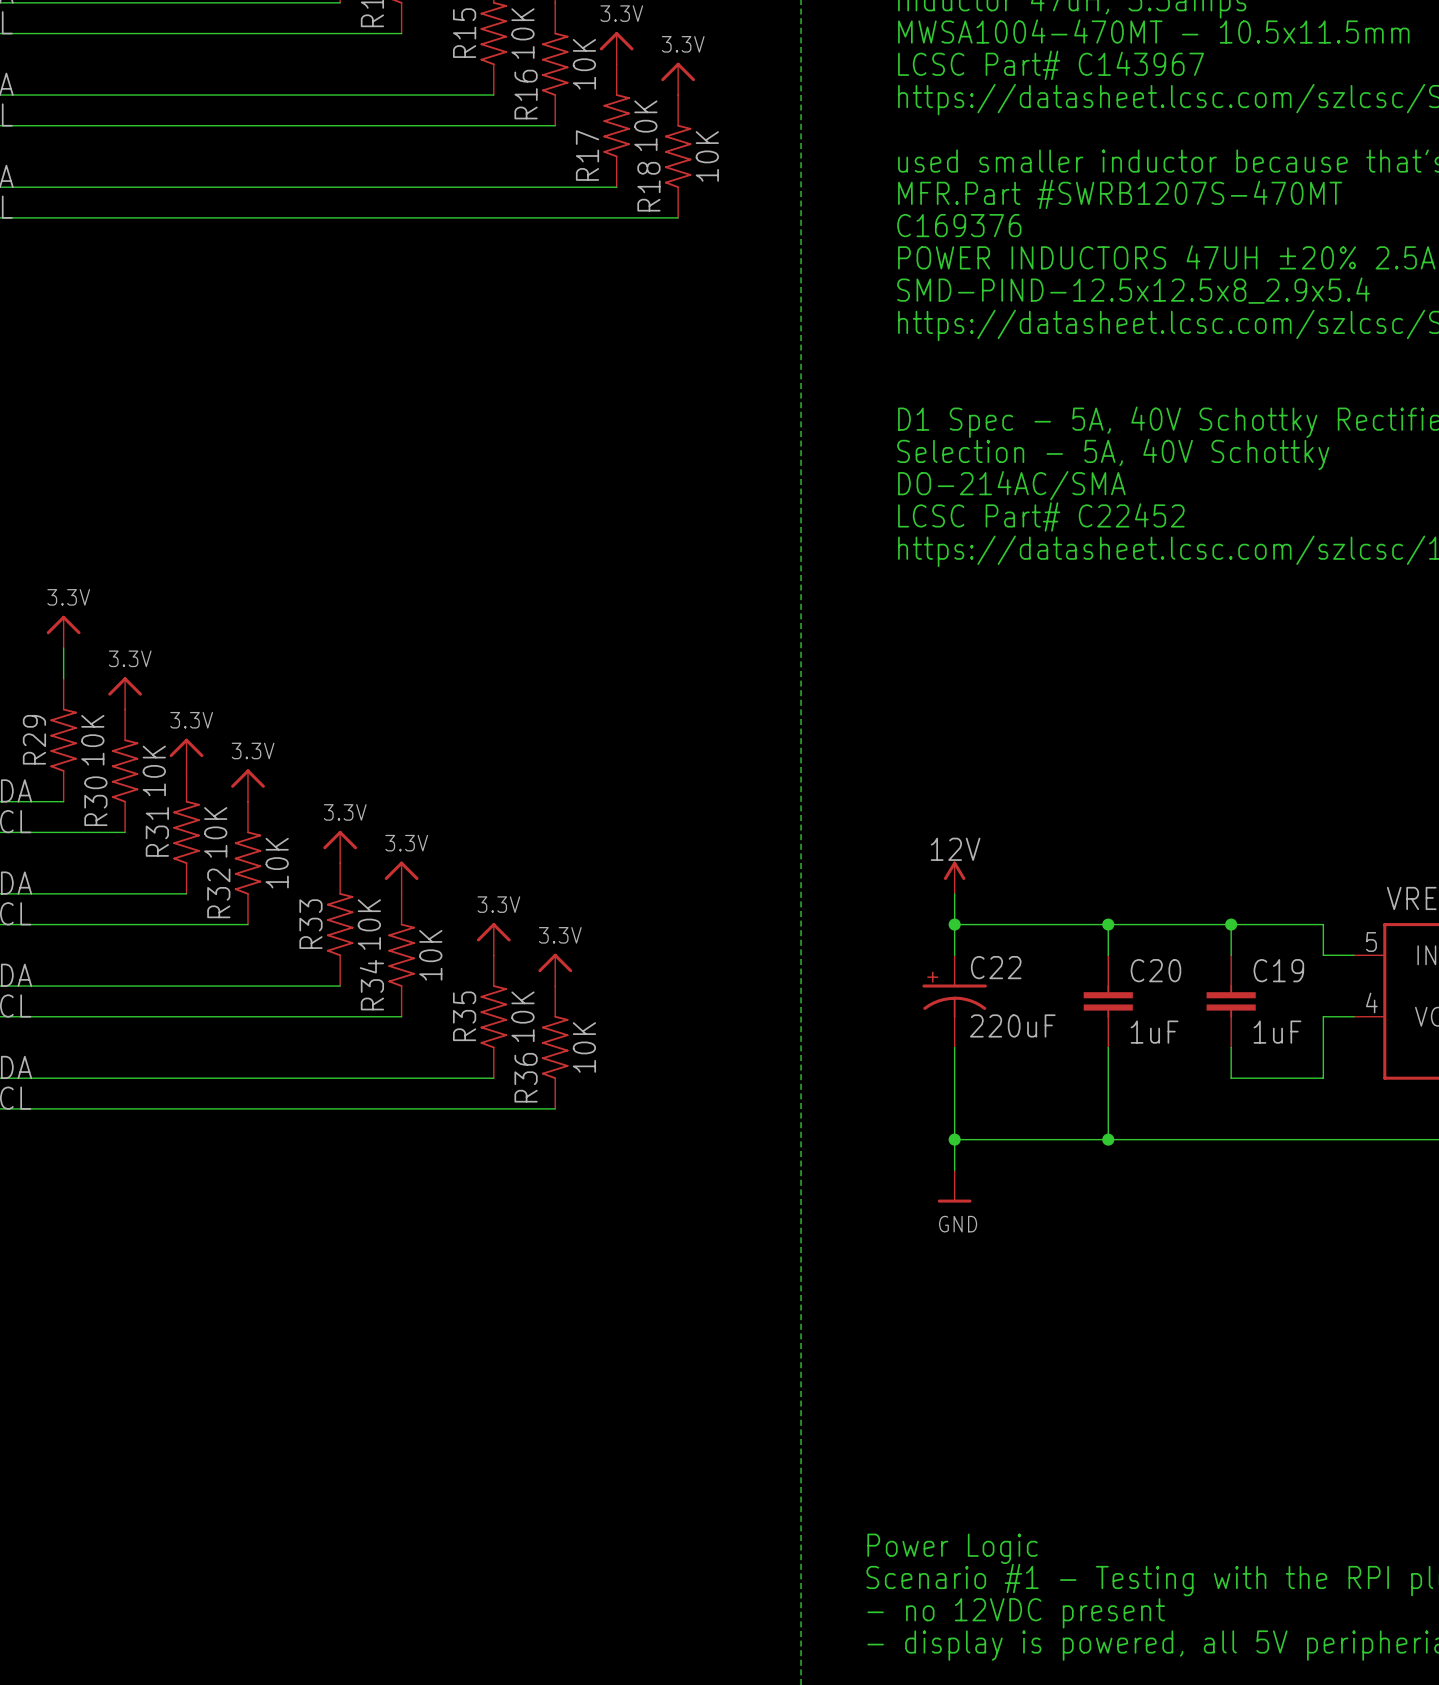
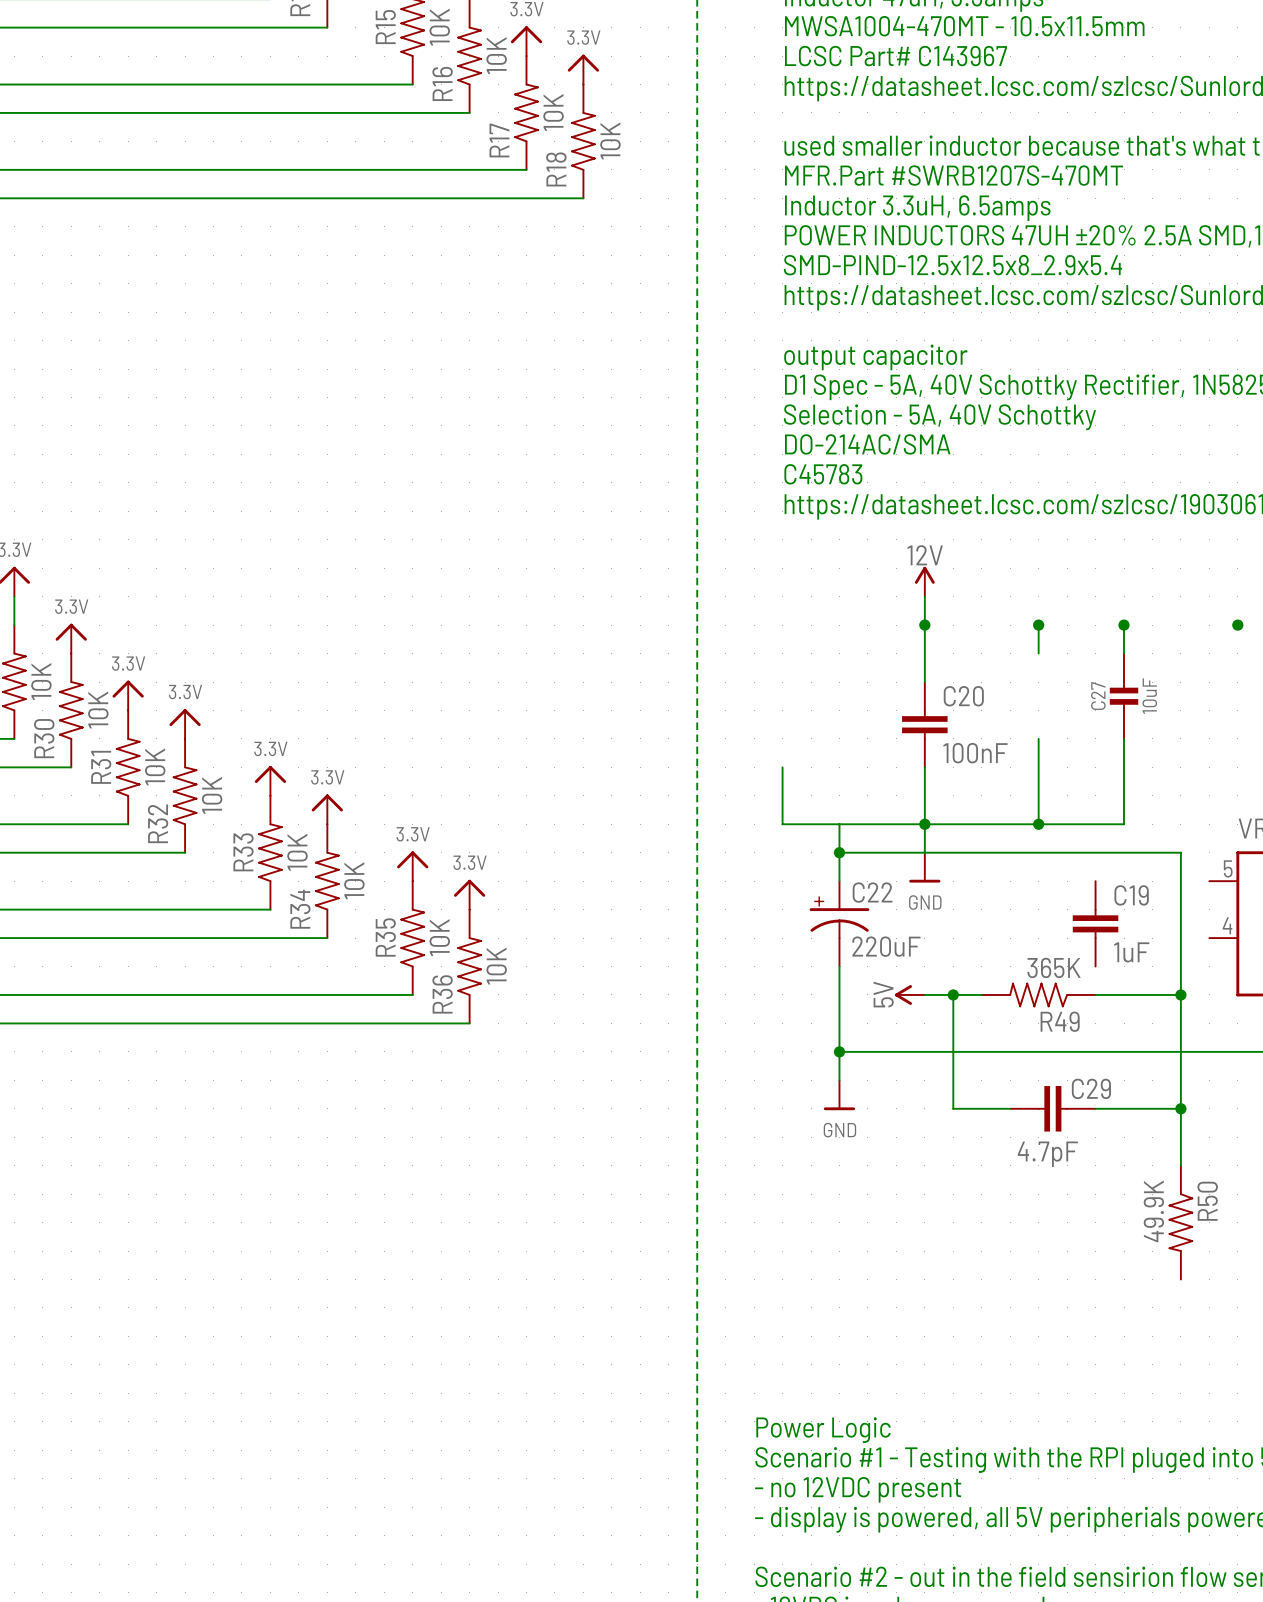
text: C169376 (959, 225) -> Inductor 3.3uH, 6.5amps (917, 208)
text: none -> output capacitor (875, 357)
text: LCSC Part# C22452 (1041, 516) -> C45783 (823, 474)
wire: none -> (924, 596) (924, 682)
junction: none -> (924, 625)
junction: none -> (1038, 625)
junction: none -> (1124, 625)
junction: none -> (1237, 625)
C27: none -> 10uF (1124, 696)
wire: none -> (1124, 738) (1124, 824) (782, 824) (782, 767)
wire: none -> (924, 767) (924, 852)
power symbol position: 12V (954, 877) -> 12V (924, 581)
junction: none -> (924, 824)
junction: none -> (1038, 824)
wire: (1108, 924) (1108, 955) -> (1038, 625) (1038, 653)
junction: (1108, 924) -> none
wire: (1231, 924) (1231, 955) -> (1124, 625) (1124, 653)
junction: (1231, 924) -> none
power symbol: none -> GND (924, 867)
wire: (1323, 955) (1354, 955) -> (1180, 881) (1180, 938)
C20 position: (1108, 1001) -> (924, 724)
wire: (1323, 1016) (1354, 1016) -> none
C20 value: 1uF (1154, 1032) -> 100nF (975, 753)
wire: (1108, 1047) (1108, 1139) -> (1038, 738) (1038, 824)
wire: (1231, 1047) (1231, 1078) -> none
power symbol: none -> 5V (909, 994)
wire: none -> (924, 994) (981, 994)
wire: none -> (953, 994) (953, 1108) (1010, 1108)
R49: none -> 365K (1038, 994)
wire: none -> (1180, 994) (1180, 1165)
junction: none -> (1180, 994)
junction position: (1108, 1139) -> (953, 994)
C29: none -> 4.7pF (1052, 1108)
wire: none -> (1095, 1108) (1180, 1108)
junction: none -> (1180, 1108)
R50: none -> 49.9K (1180, 1222)

